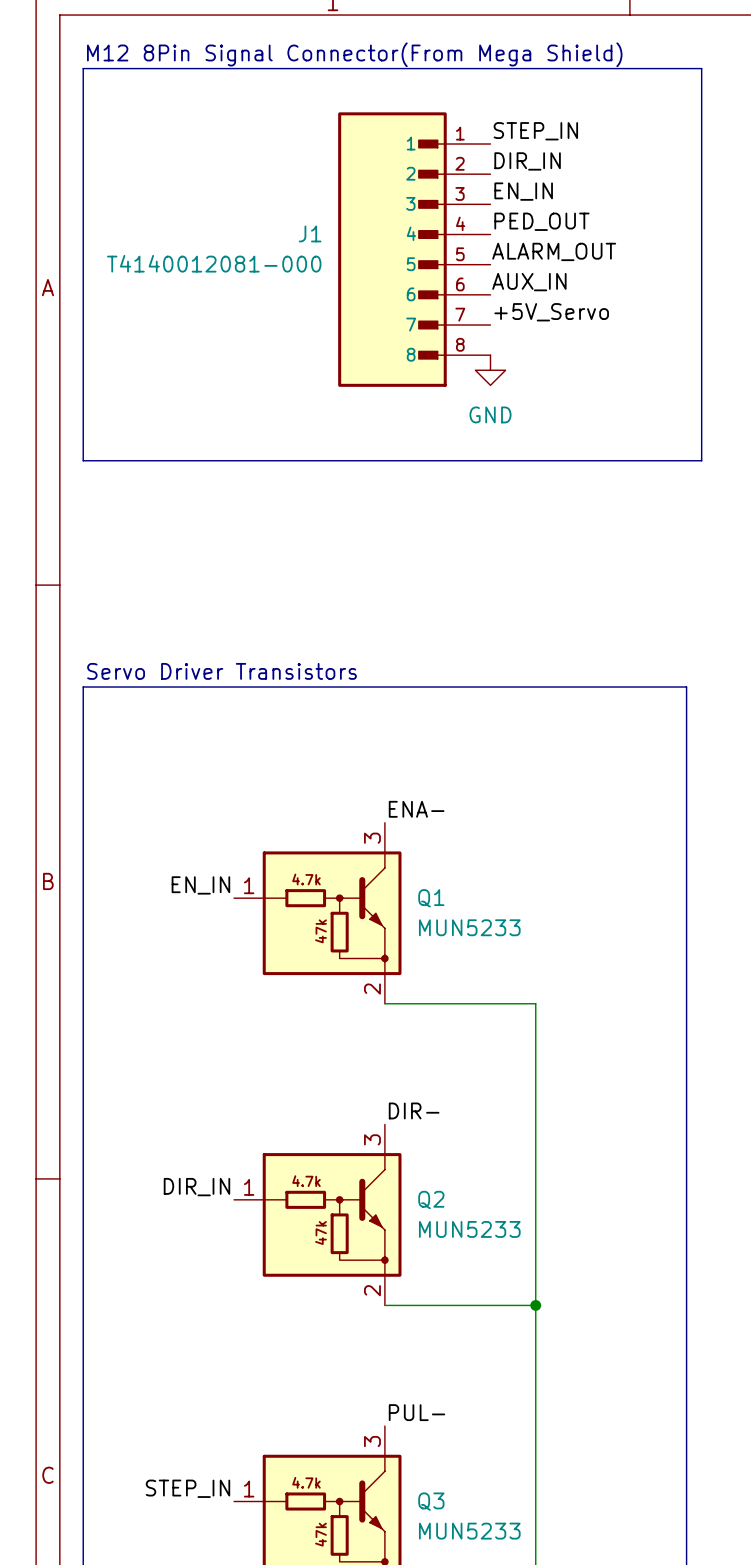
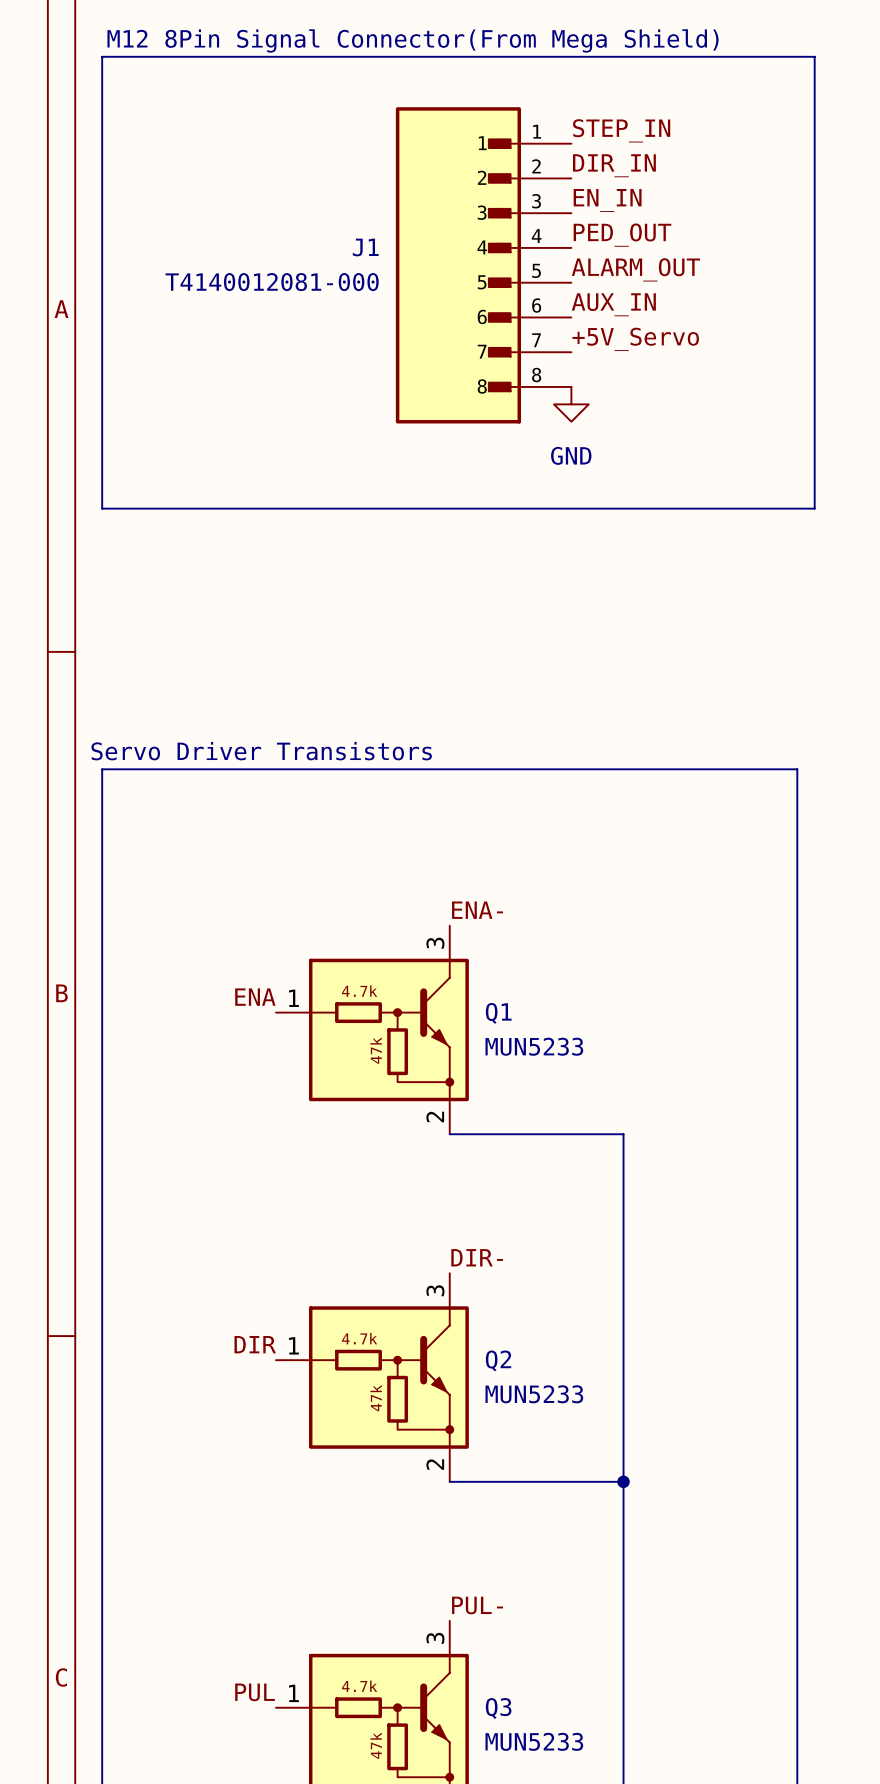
label: EN_IN (200, 885) -> ENA (255, 997)
label: DIR_IN (196, 1187) -> DIR (255, 1344)
label: STEP_IN (187, 1488) -> PUL (255, 1692)

